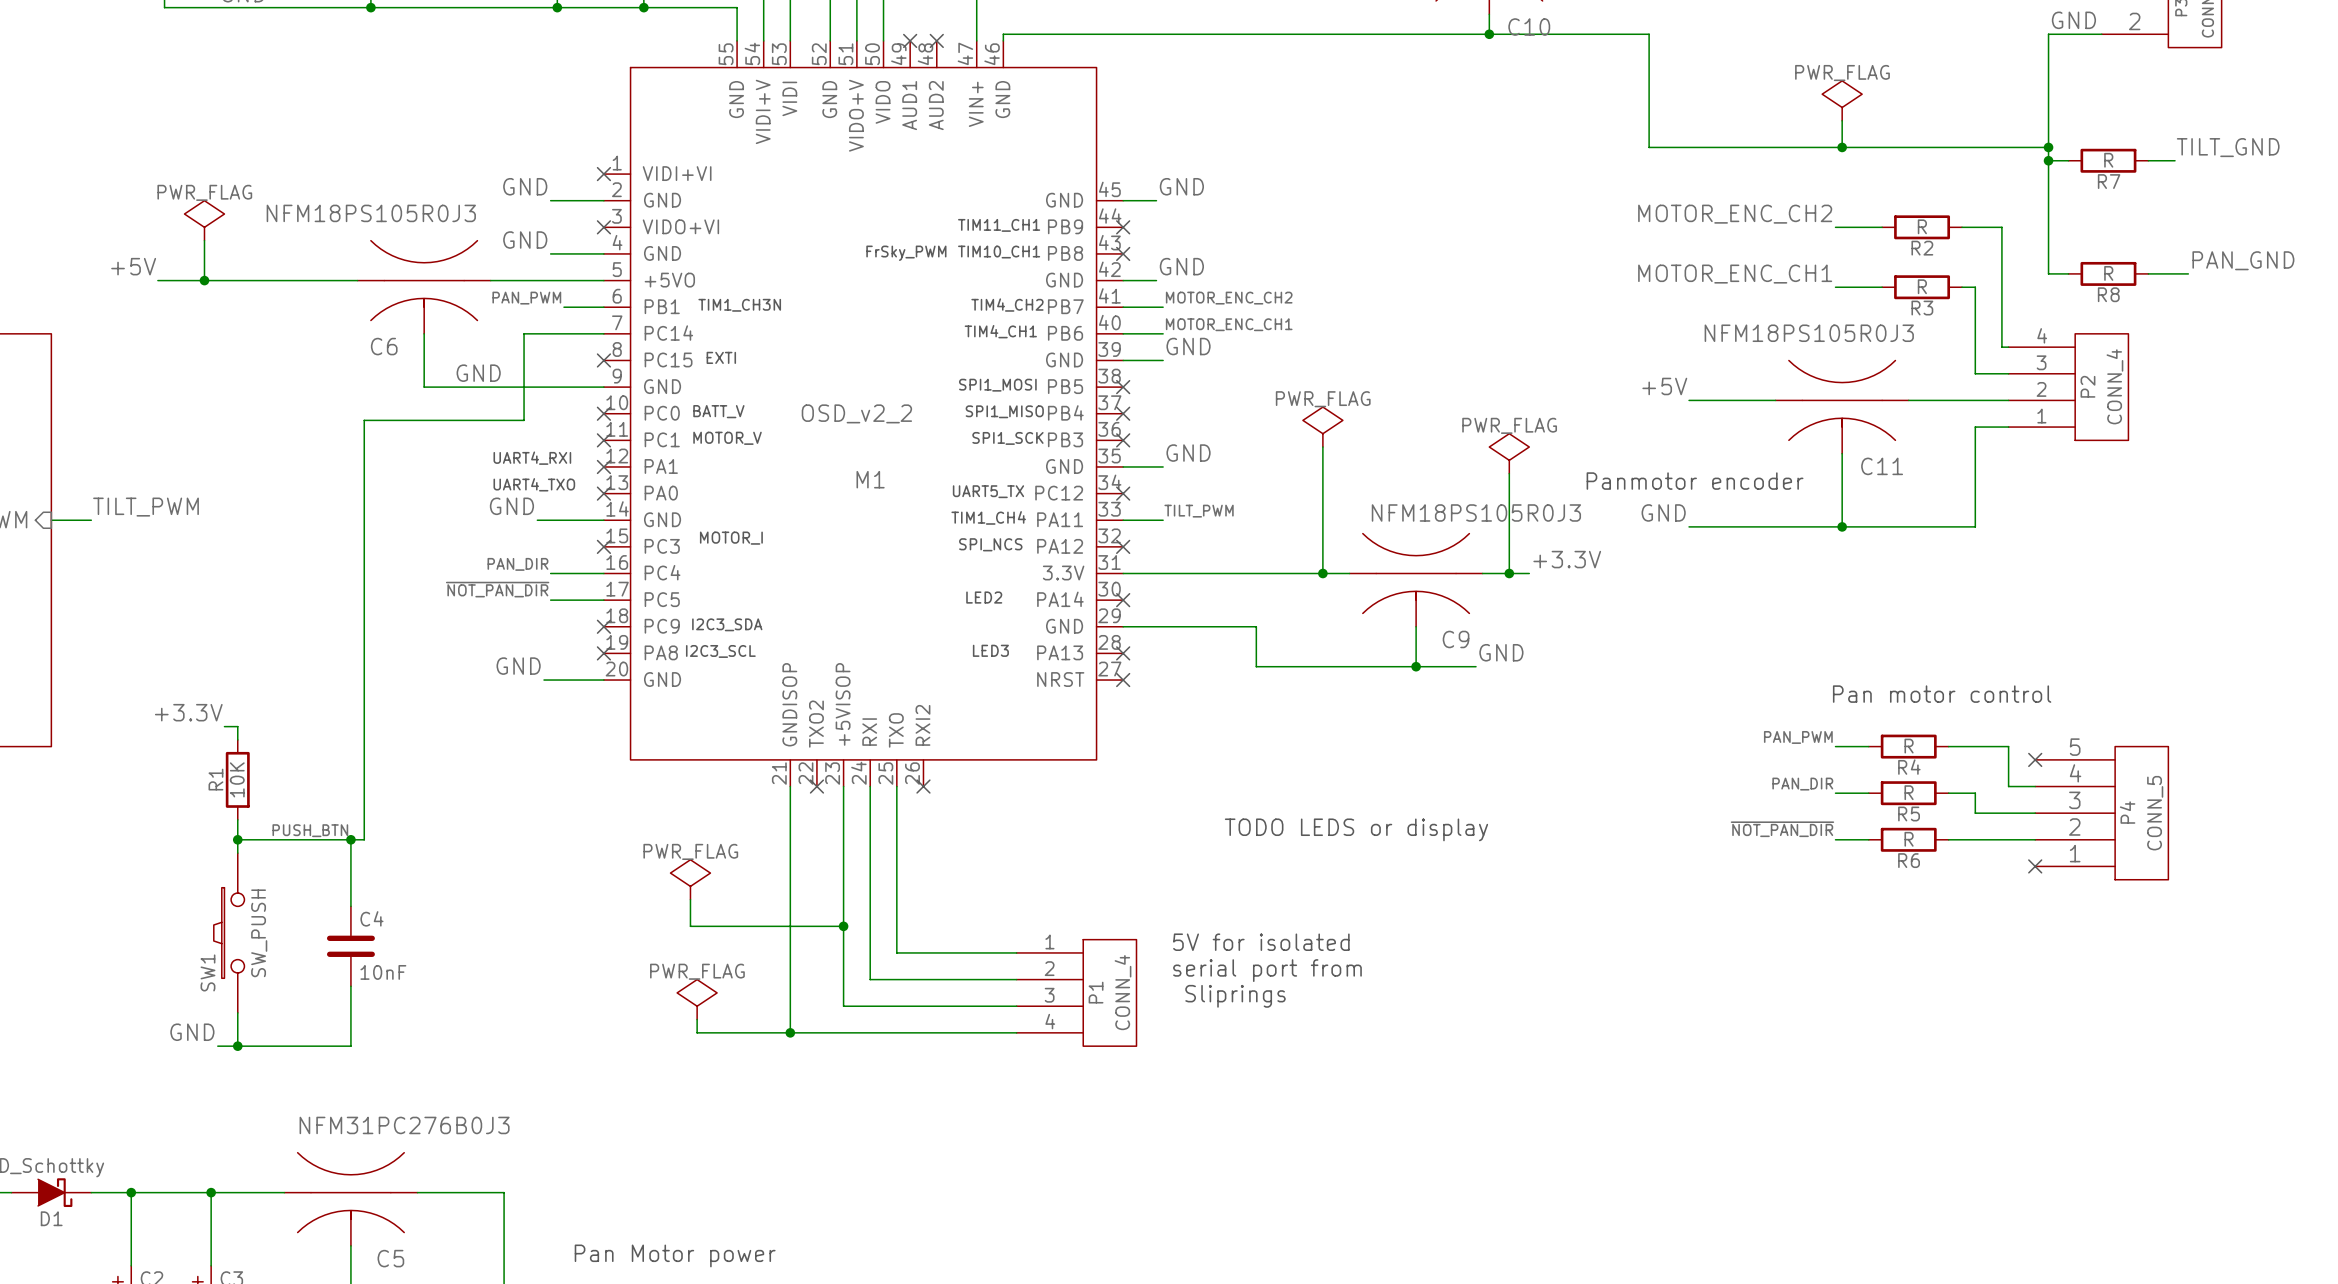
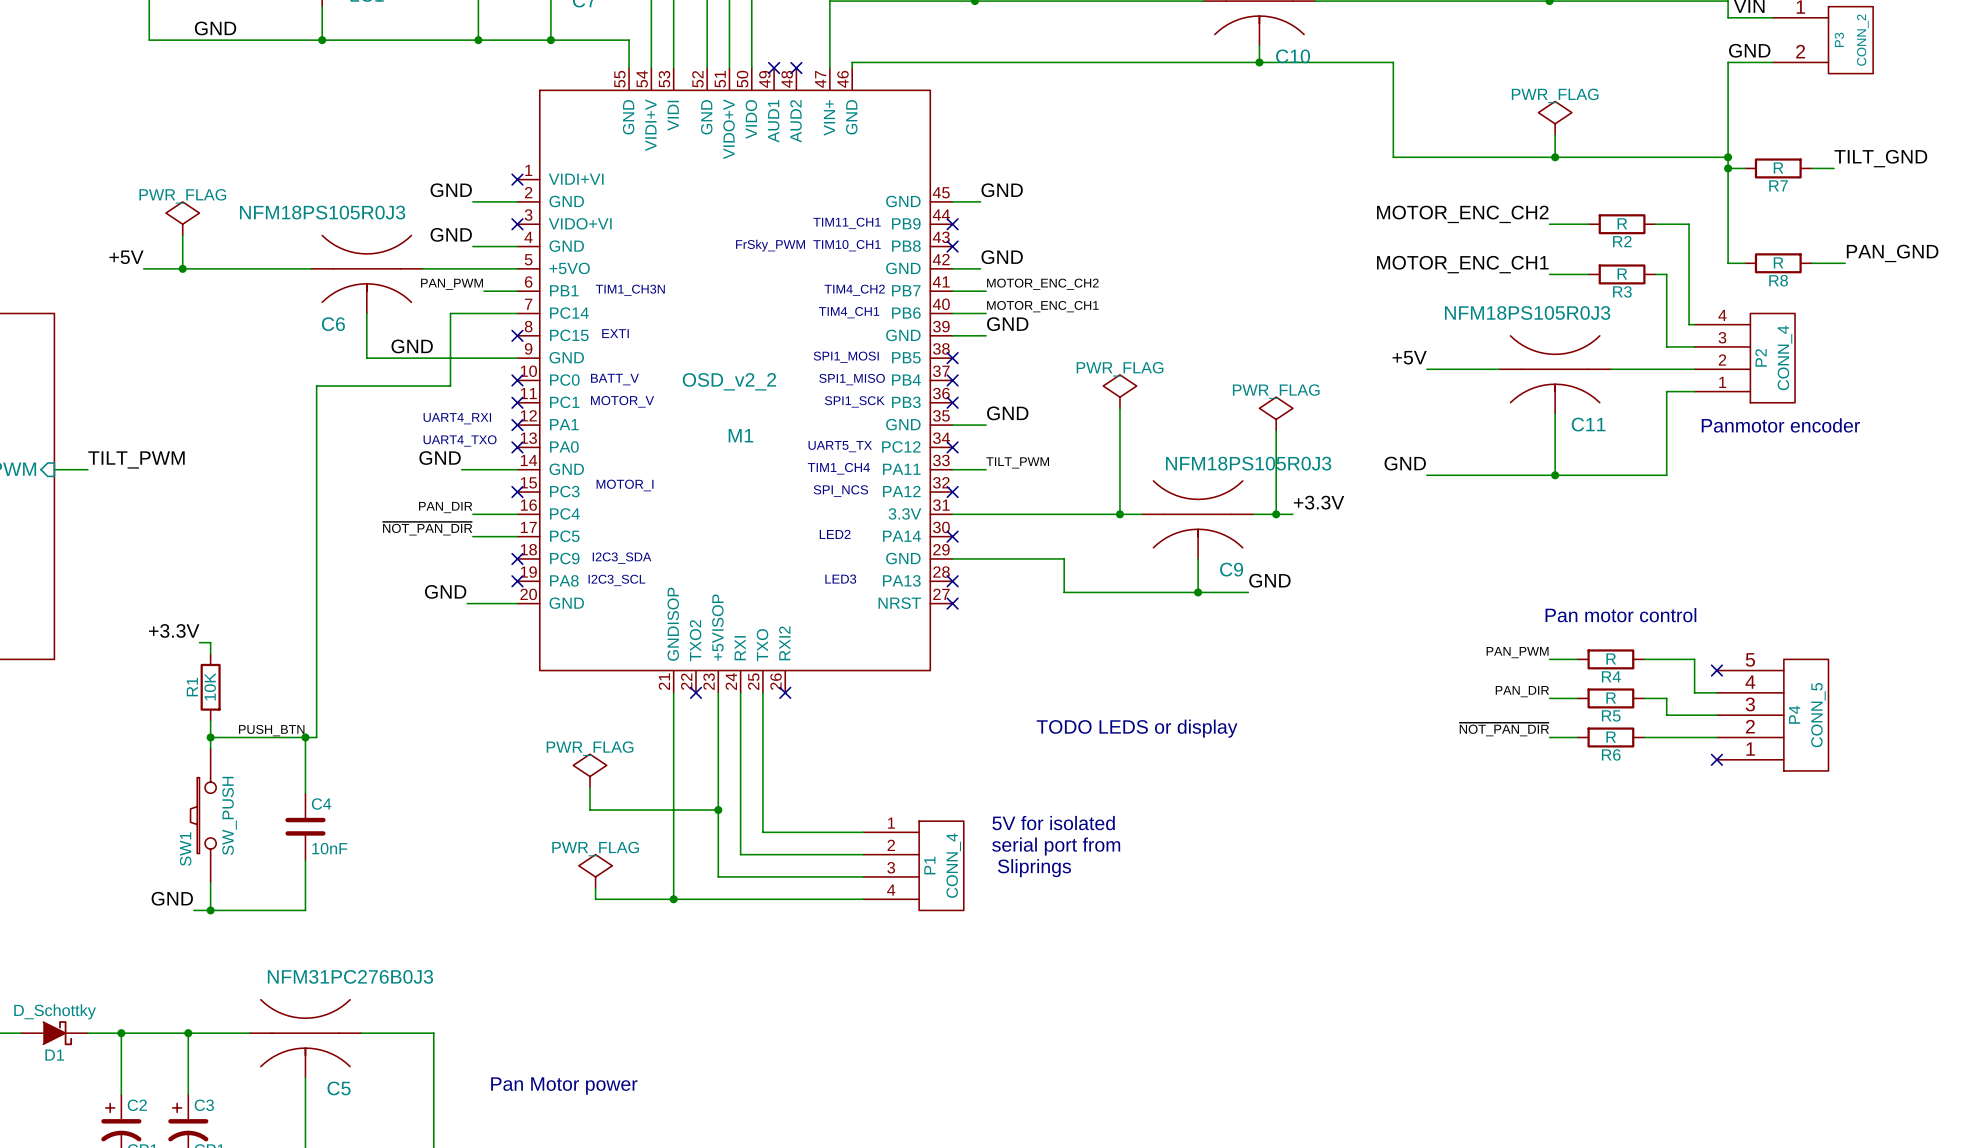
text: none -> Panmotor encoder (1780, 425)
text: Panmotor encoder (1695, 481) -> none

